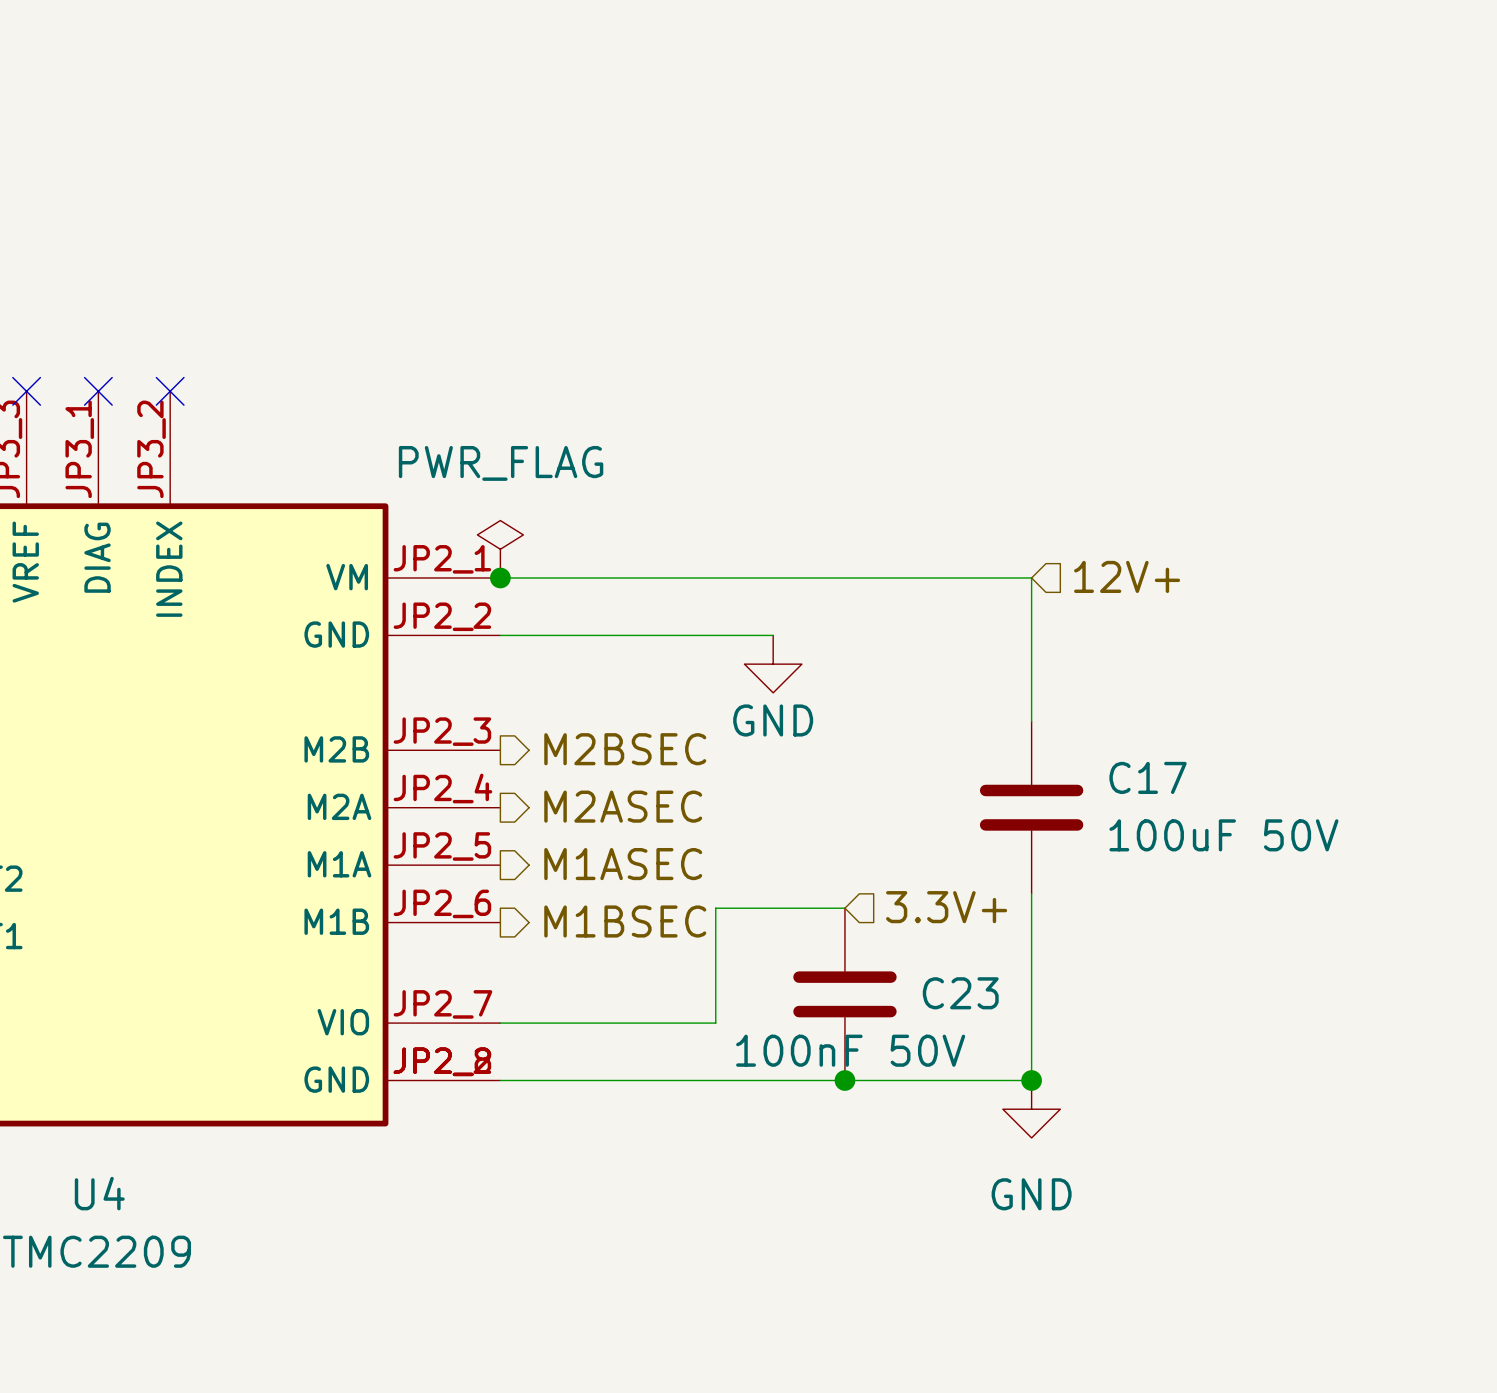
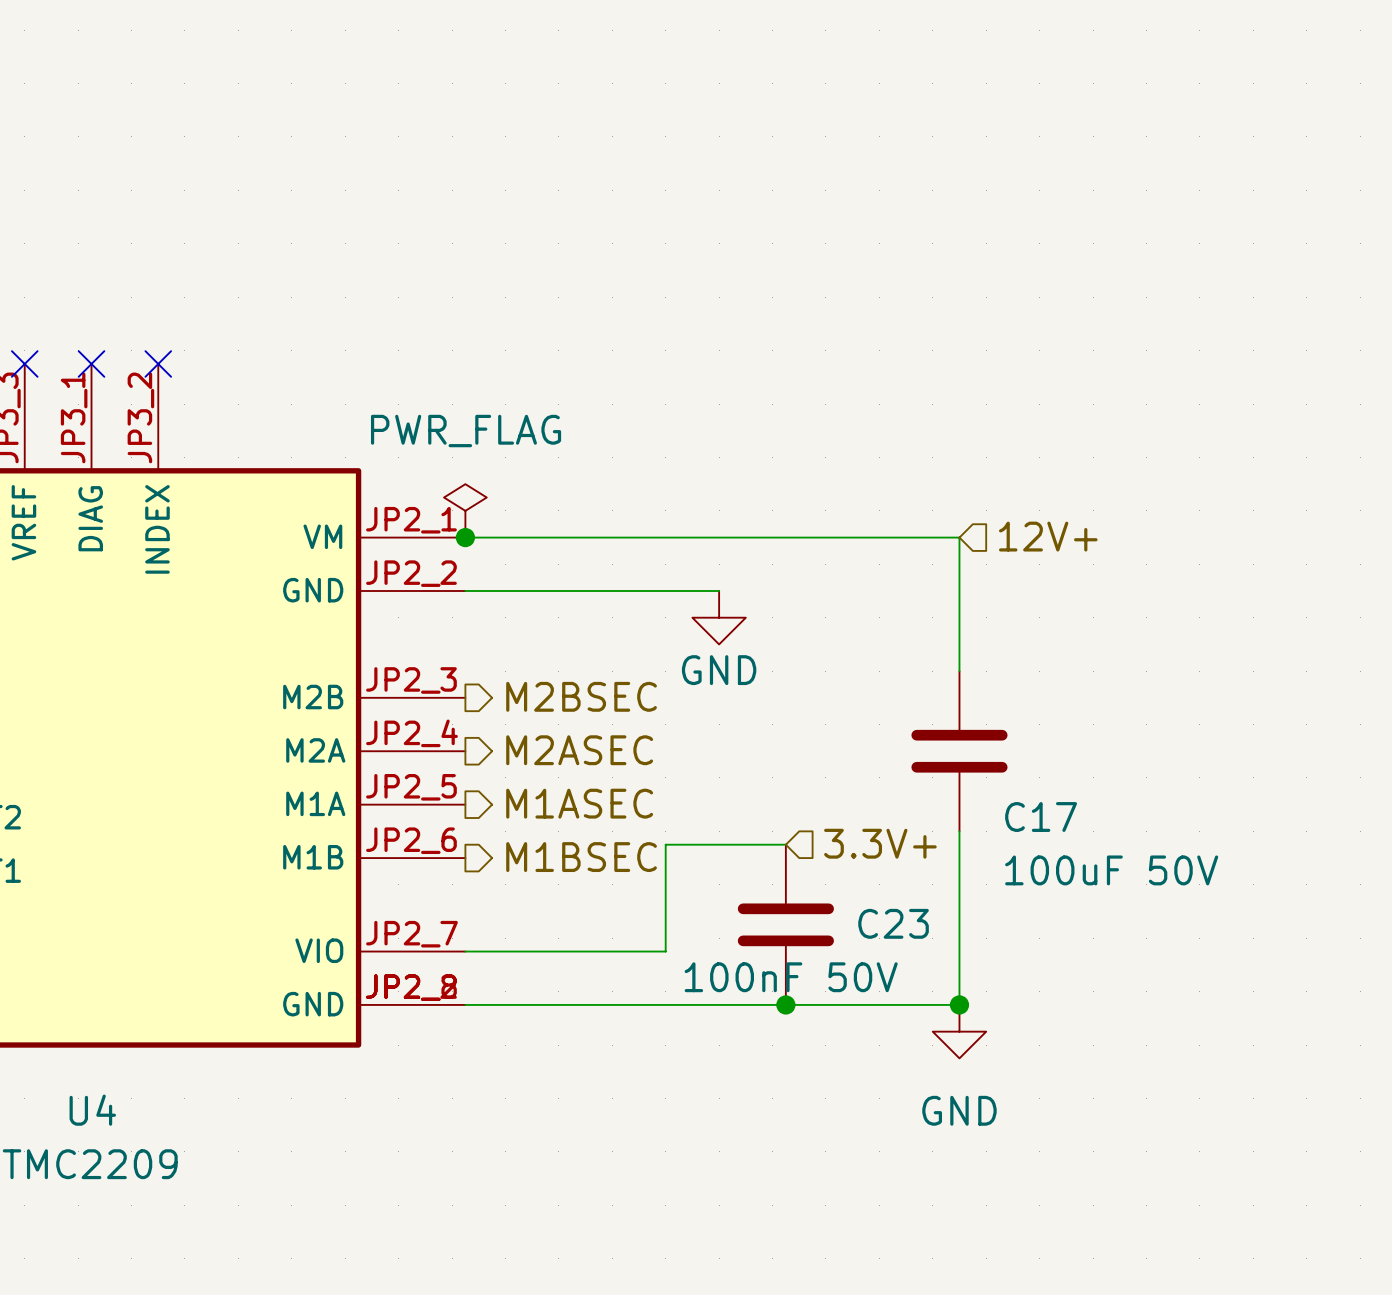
C17 name position: C17 (1148, 777) -> C17 (1041, 817)
C17 value position: 100uF 50V (1223, 835) -> 100uF 50V (1111, 870)

